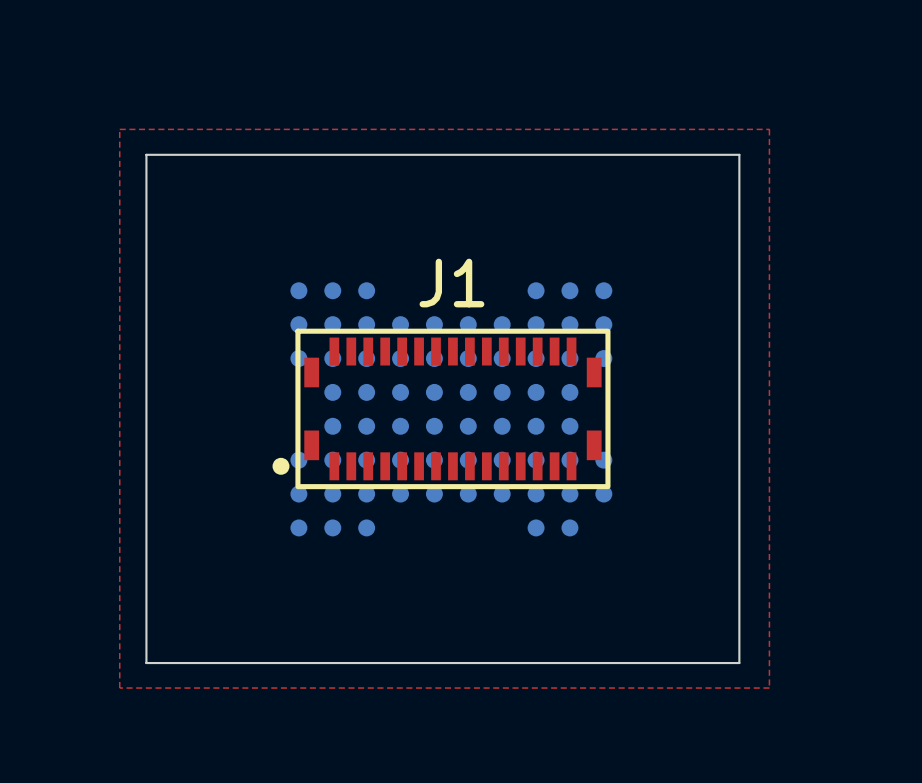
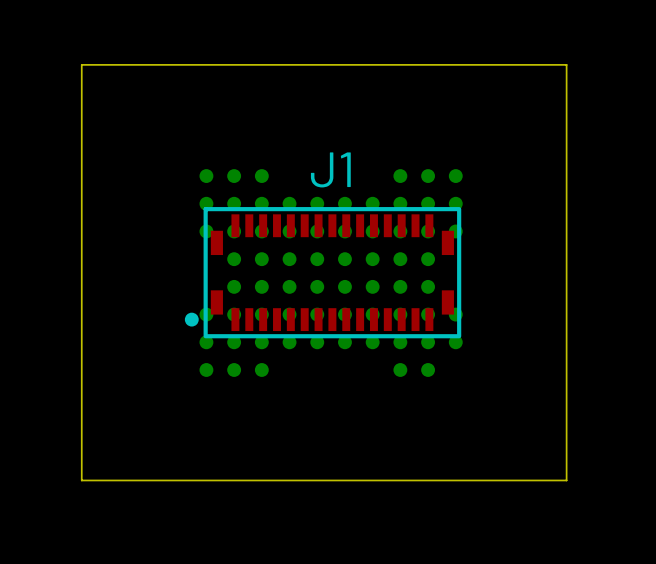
top zone outline: (119, 129) (769, 129) (769, 688) (119, 688) (119, 129) -> none

